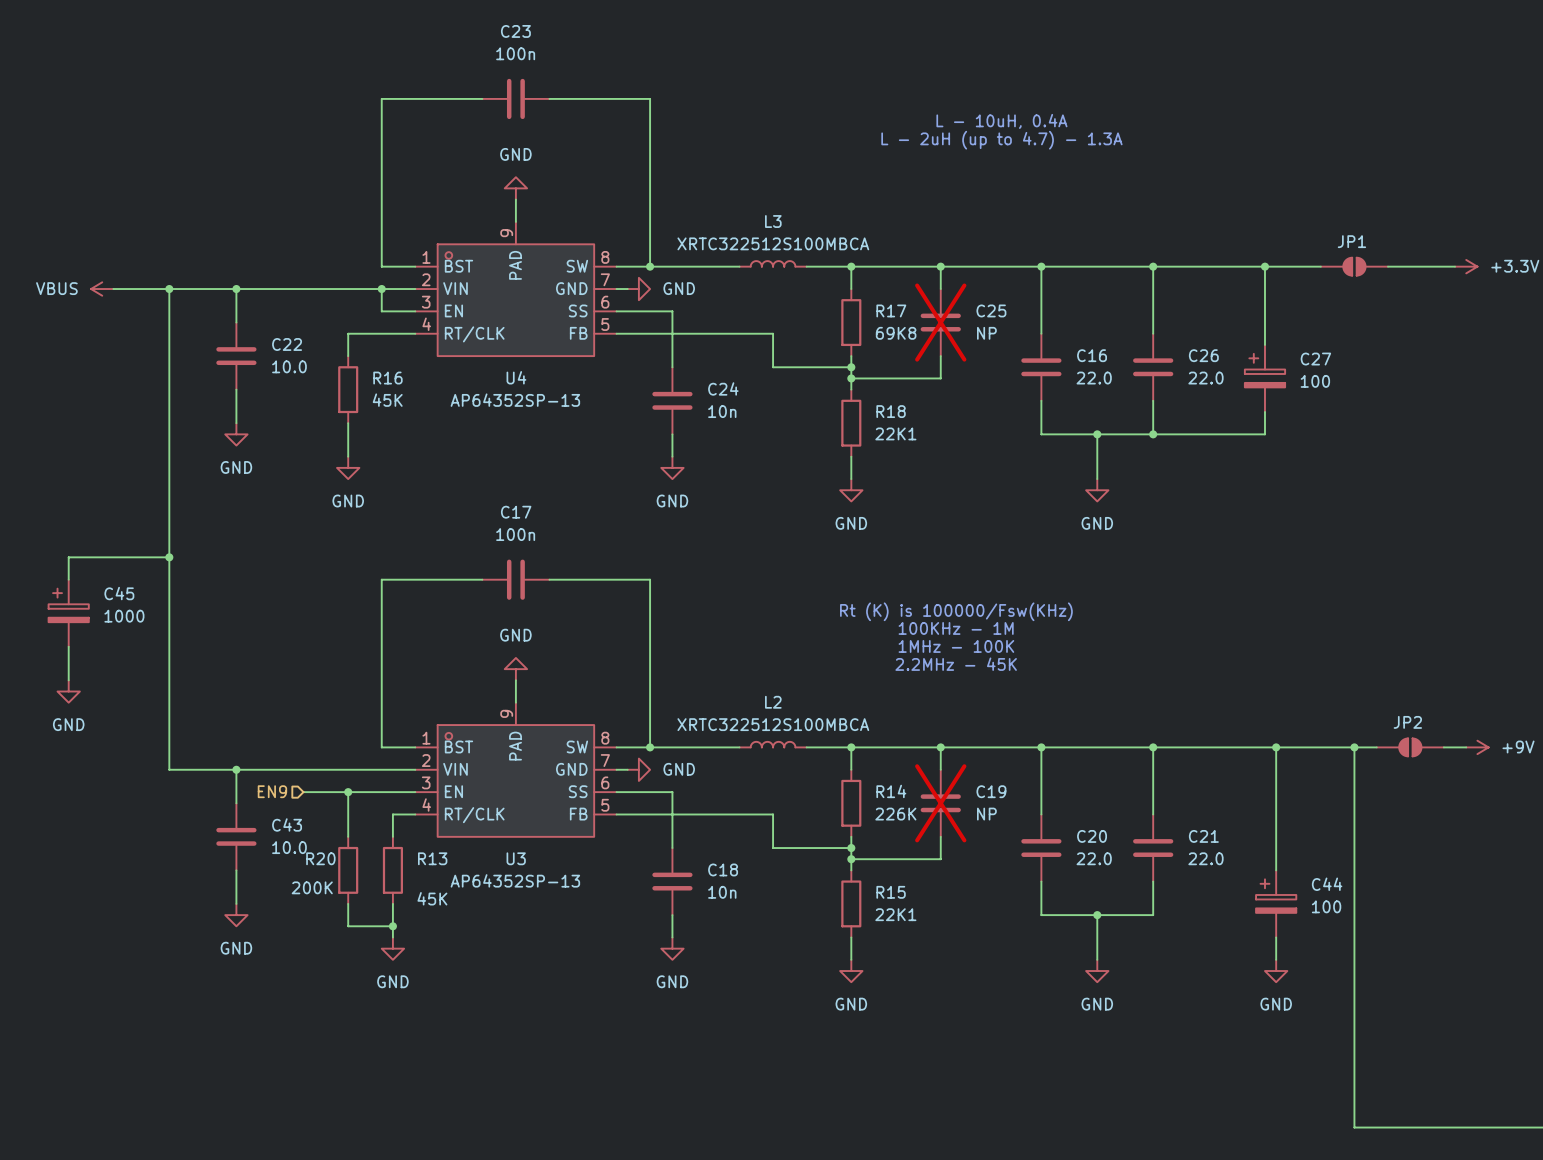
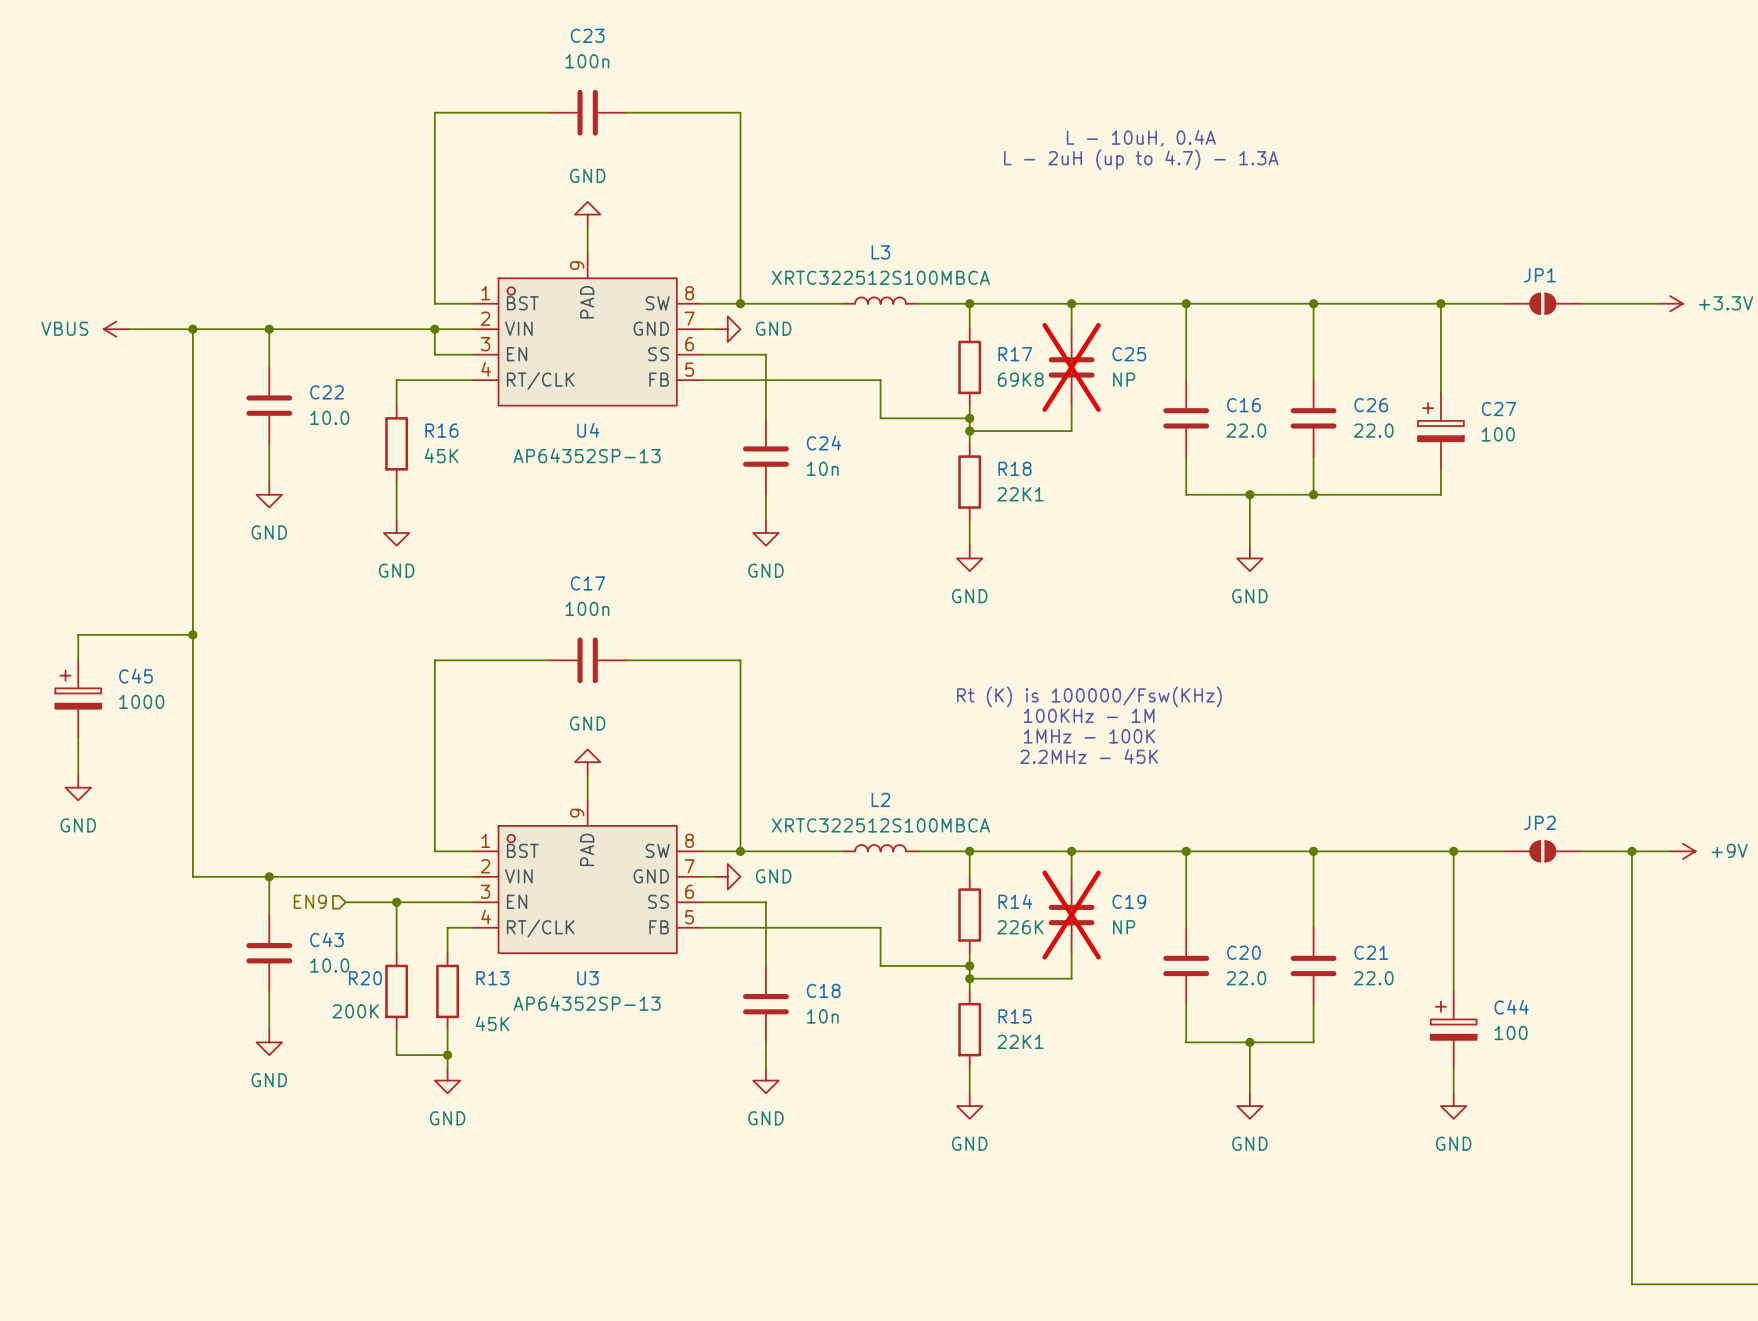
wire: (1354, 747) (1354, 1127) (1432, 1127) -> (1631, 851) (1631, 1284)
junction: (1354, 747) -> none
JP2 position: (1410, 747) -> (1542, 851)
junction: none -> (1631, 851)

